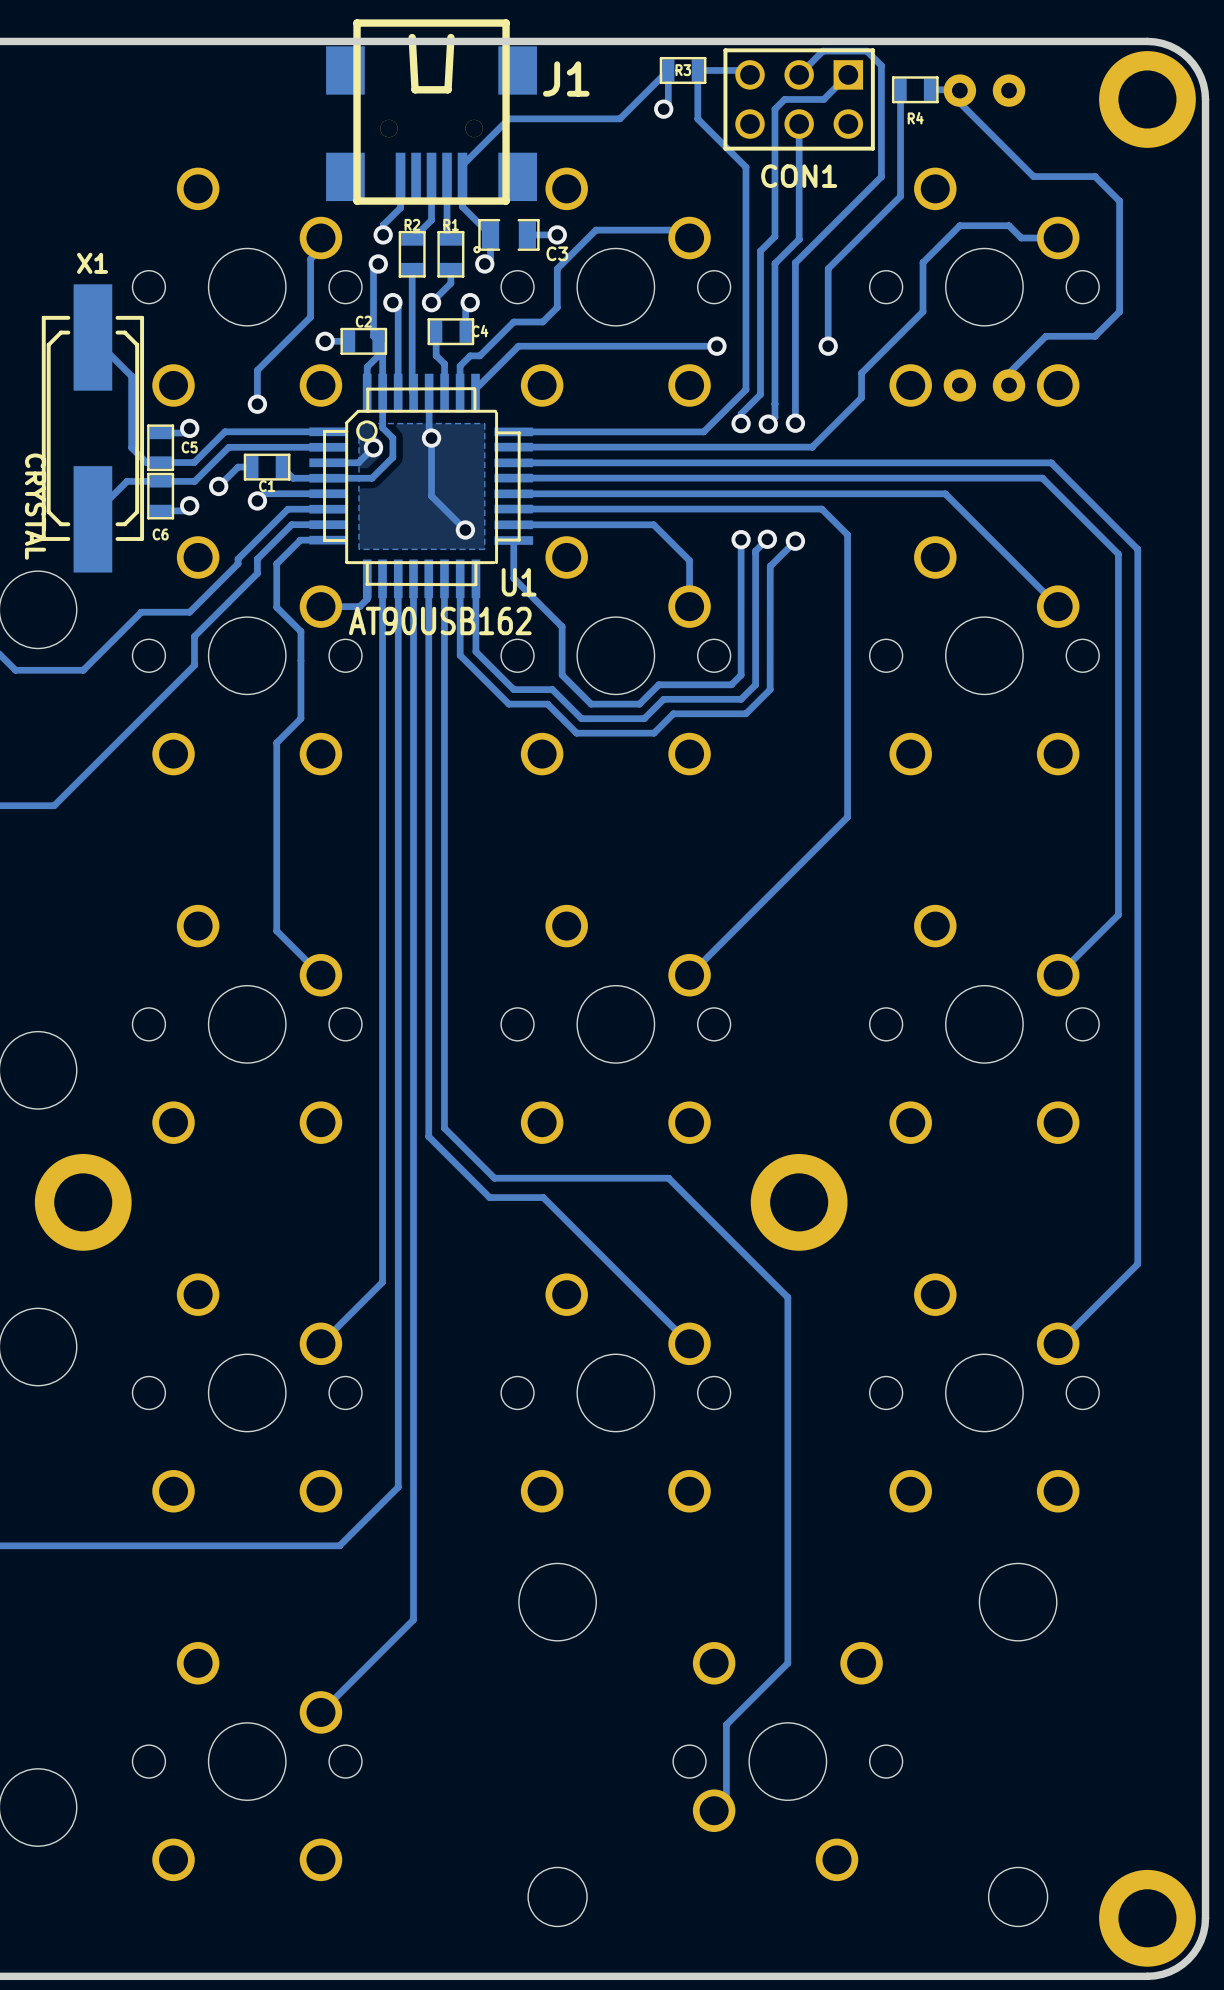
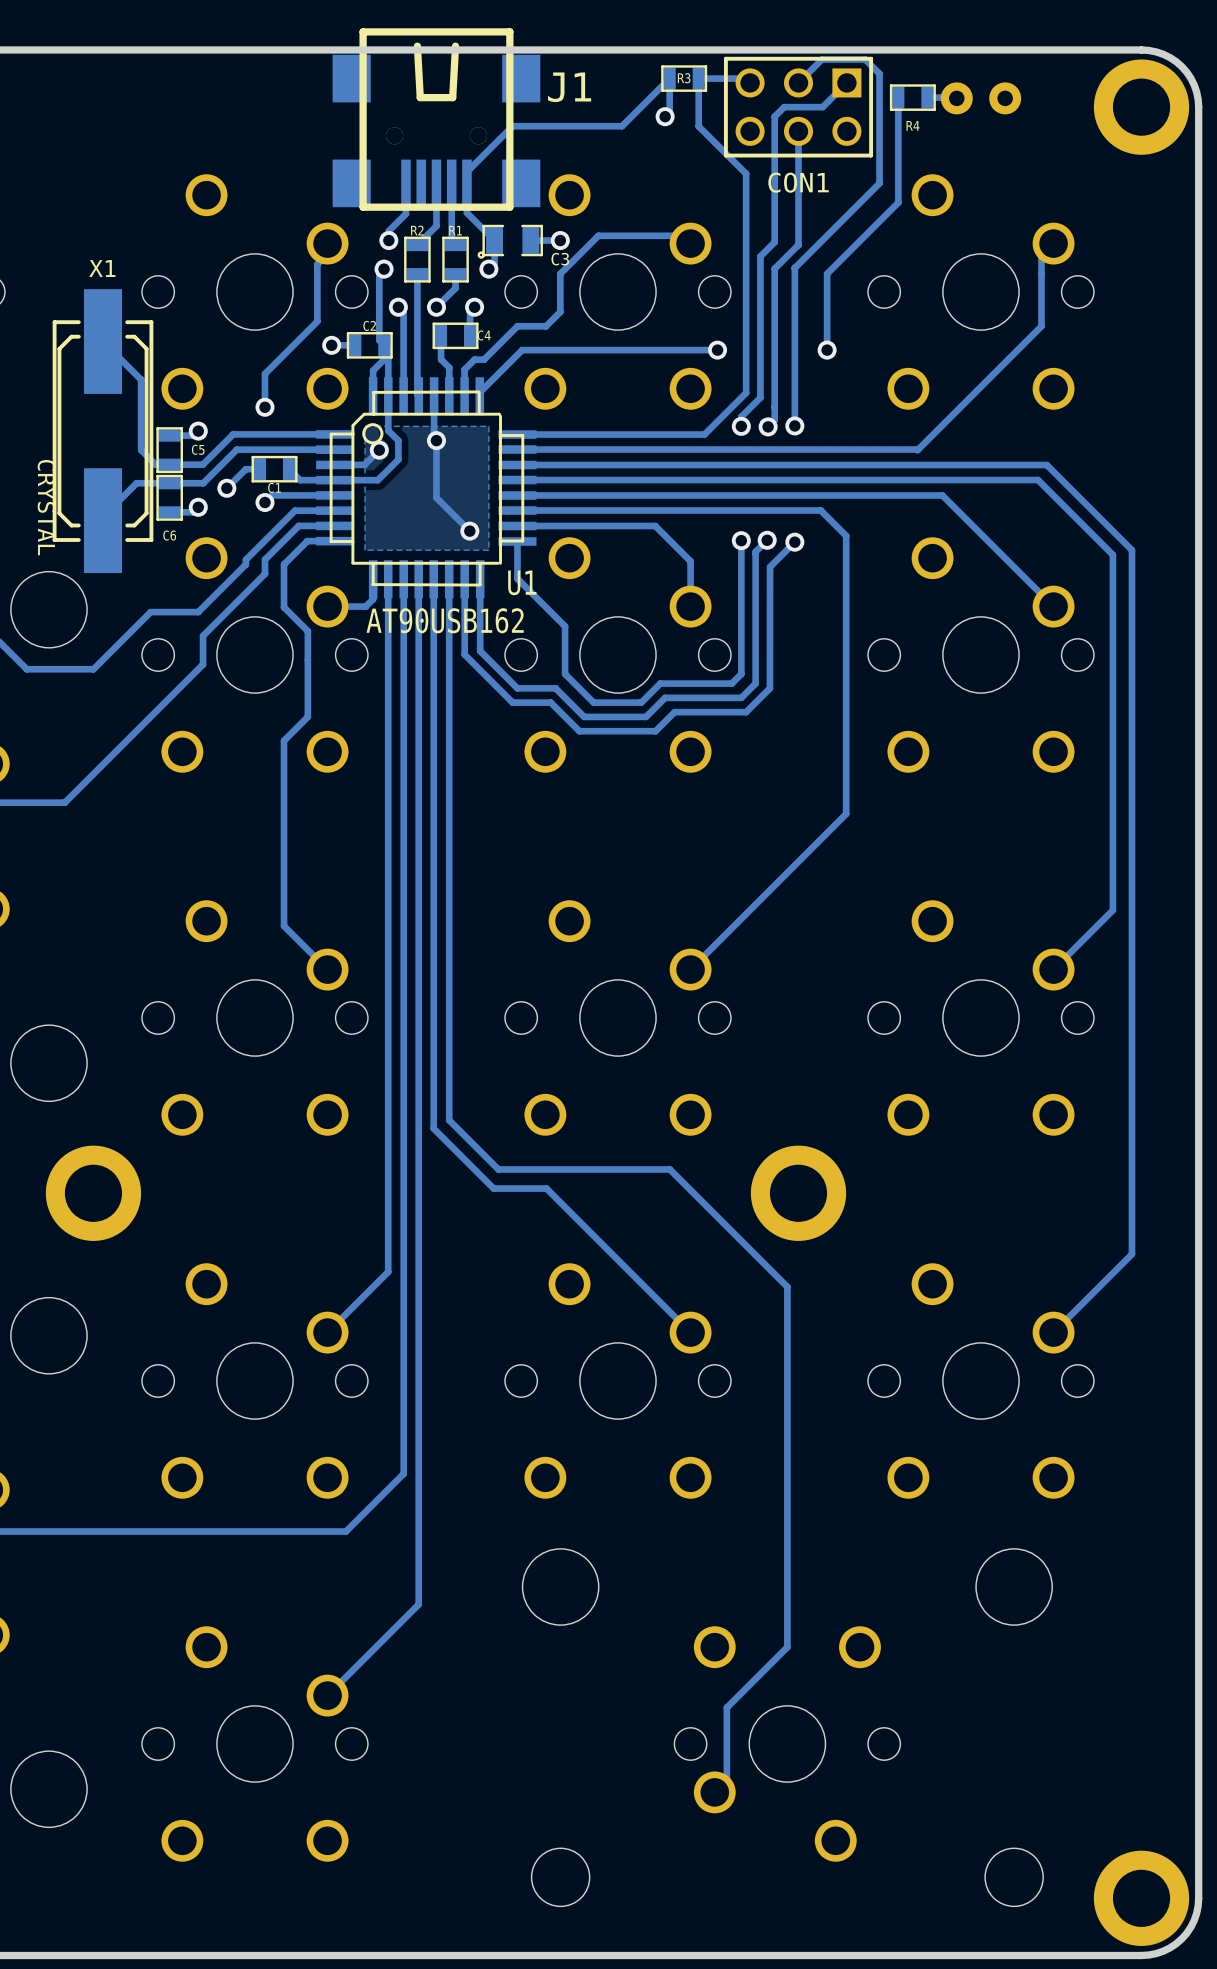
track: (959, 90) (959, 102) (1033, 176) (1095, 176) (1119, 201) (1119, 311) (1095, 336) (1045, 336) (1009, 373) (1009, 385) -> none
track: (1058, 238) (1021, 238) (1009, 225) (959, 225) (923, 262) (923, 311) (861, 373) (861, 397) (812, 447) -> (1053, 243) (1041, 255) (1041, 326) (917, 450) (811, 449)
part: (984, 385) -> none

